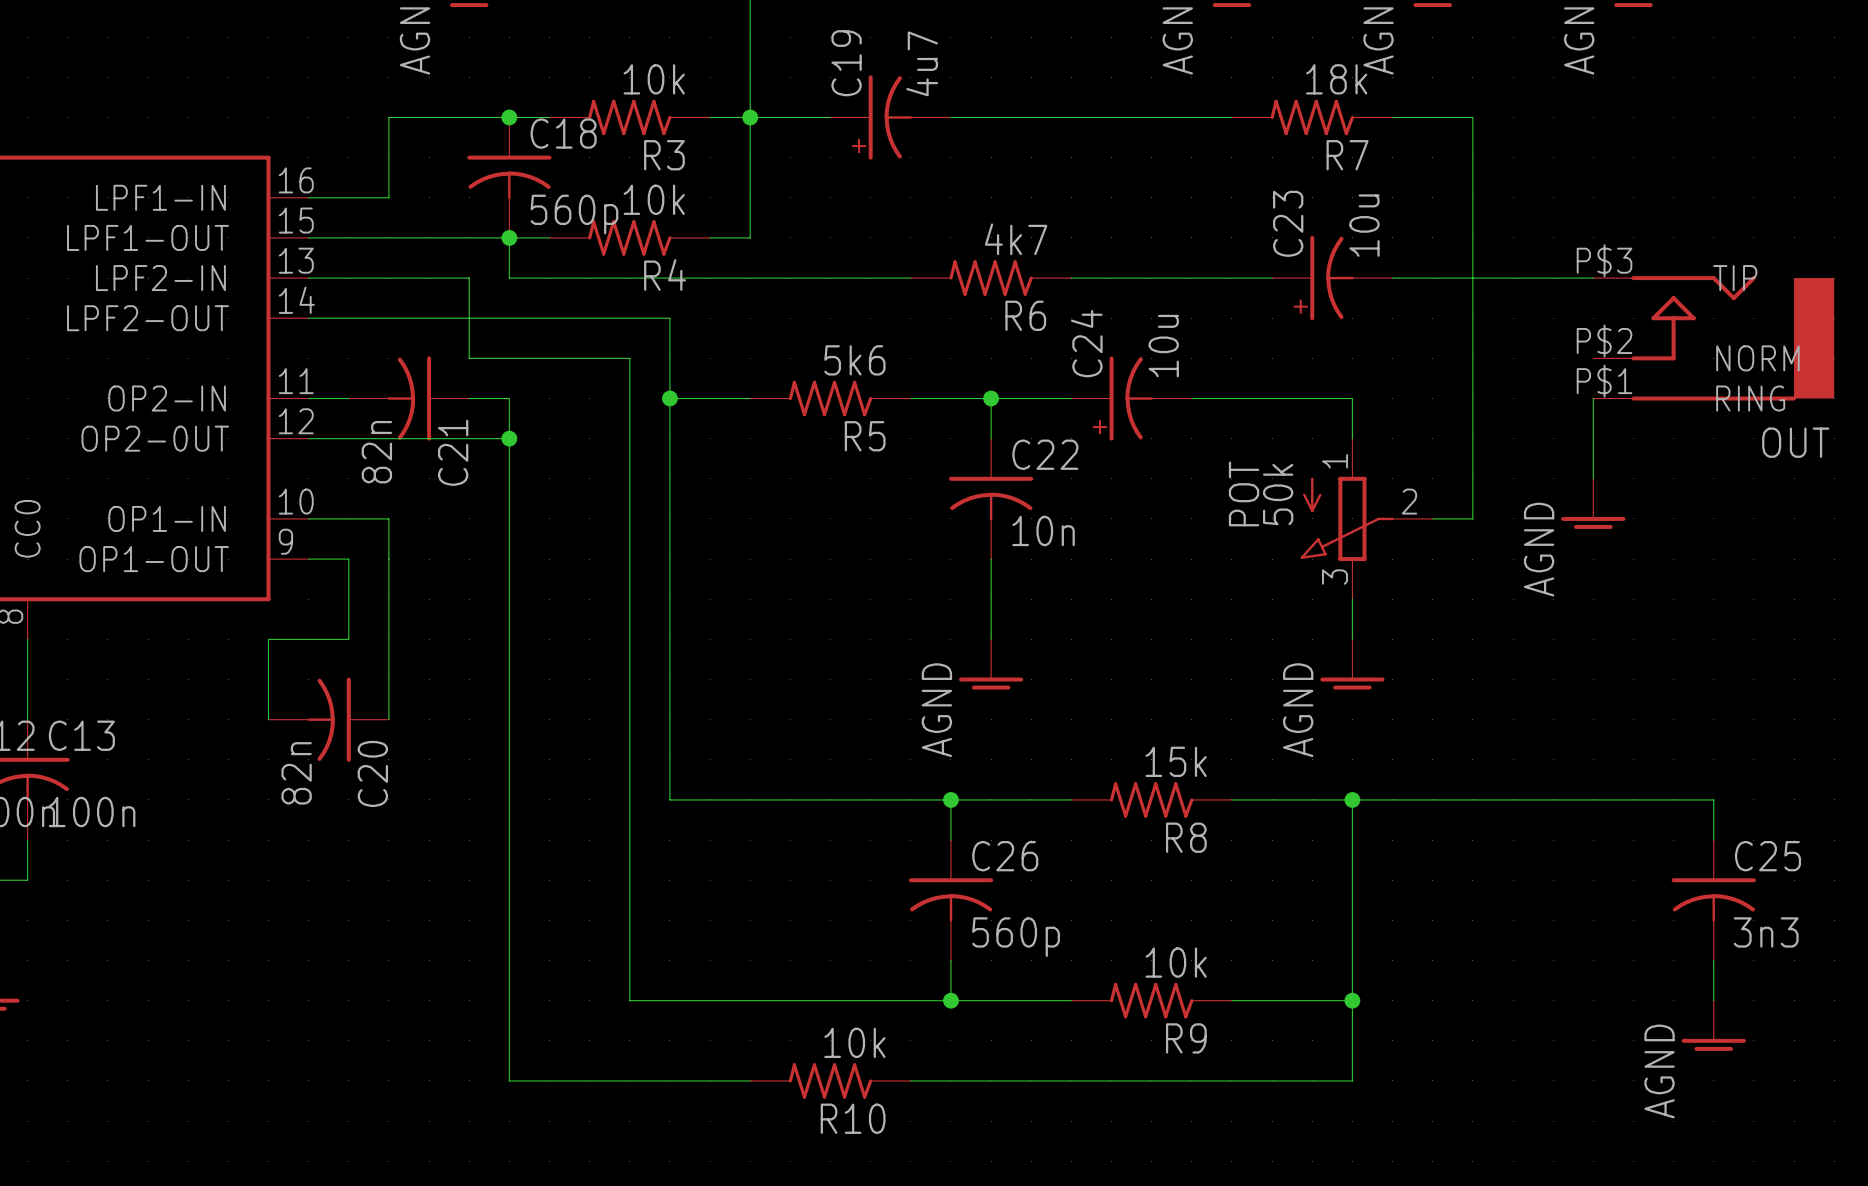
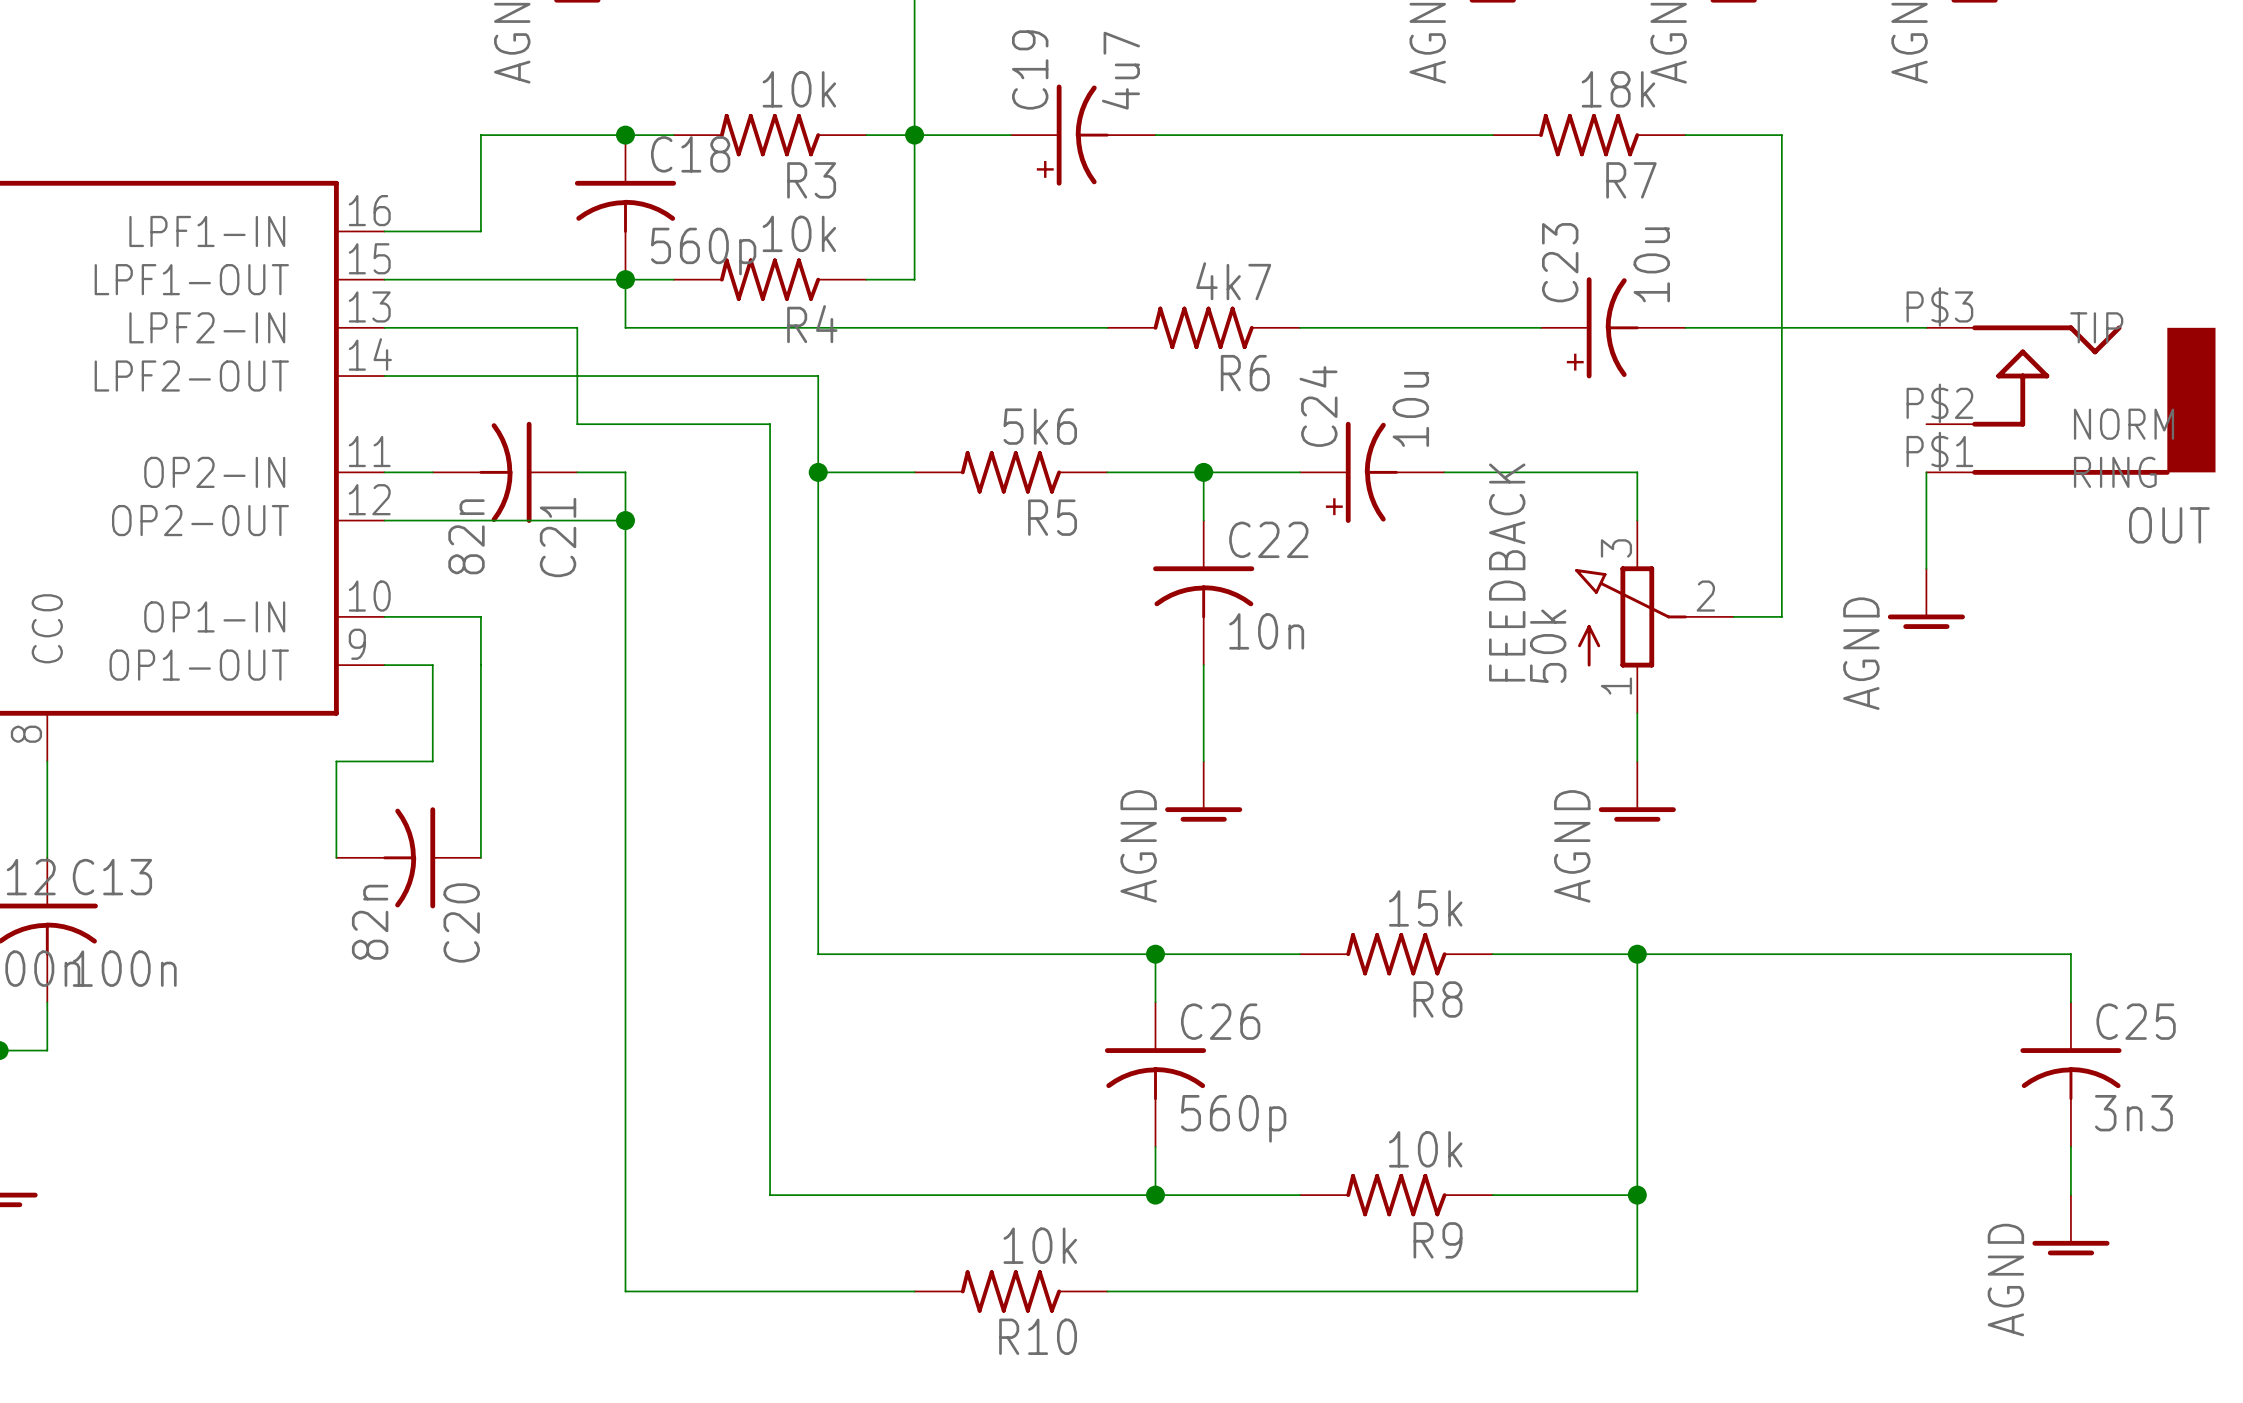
POT: 50k (1366, 518) -> none
FEEDBACK: none -> 50k (1654, 616)

